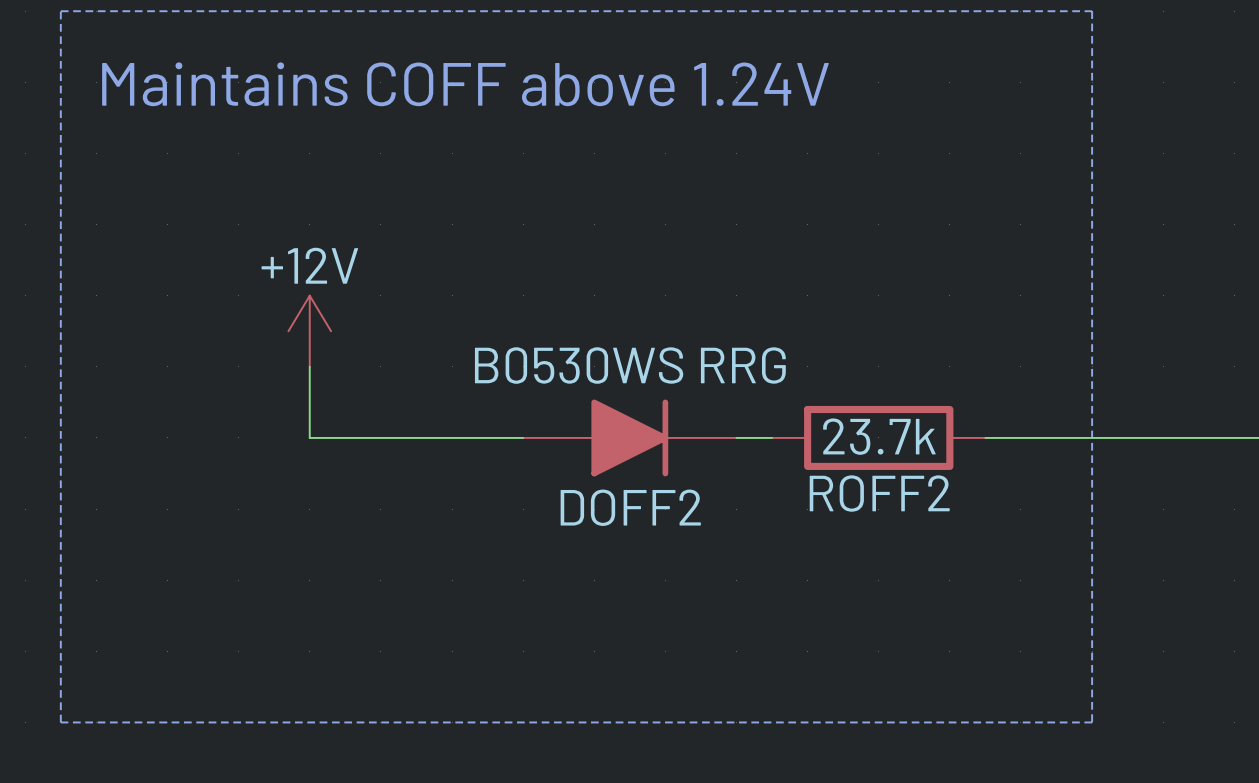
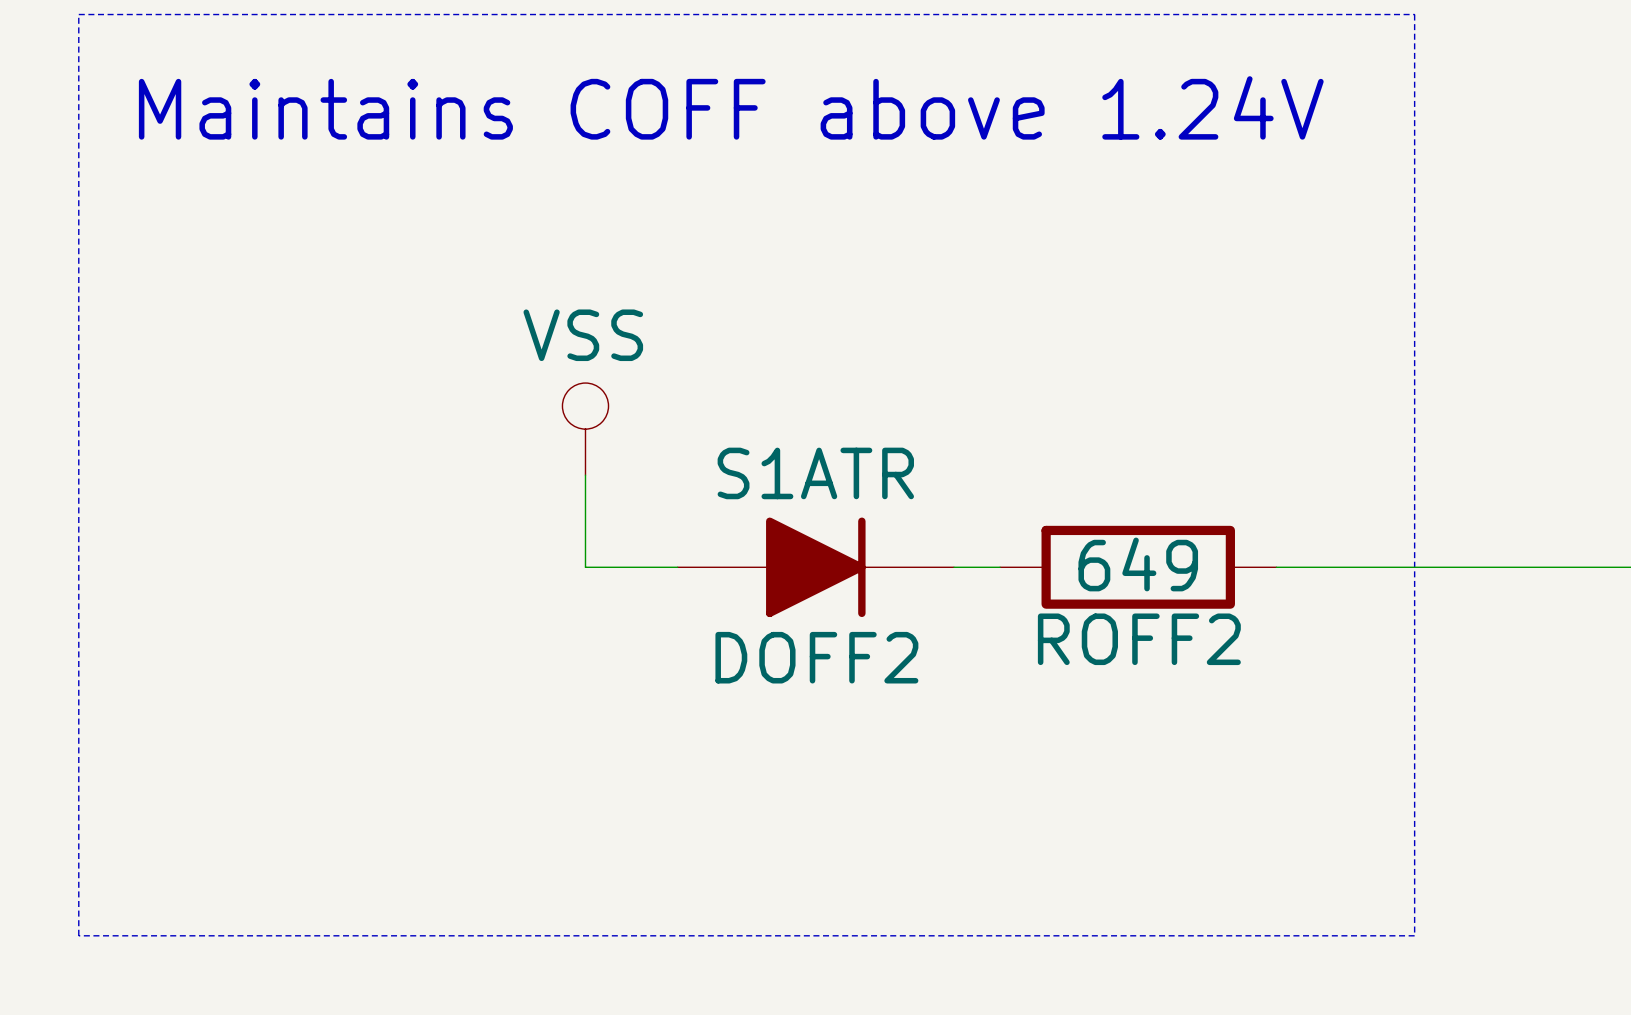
power symbol: +12V (309, 331) -> none
power symbol: none -> VSS (585, 429)
DOFF2 value: B0530WS RRG (630, 365) -> S1ATR (815, 473)
wire: (309, 366) (309, 437) (452, 437) -> (585, 475) (585, 567)
ROFF2 value: 23.7k (879, 436) -> 649 (1138, 564)

